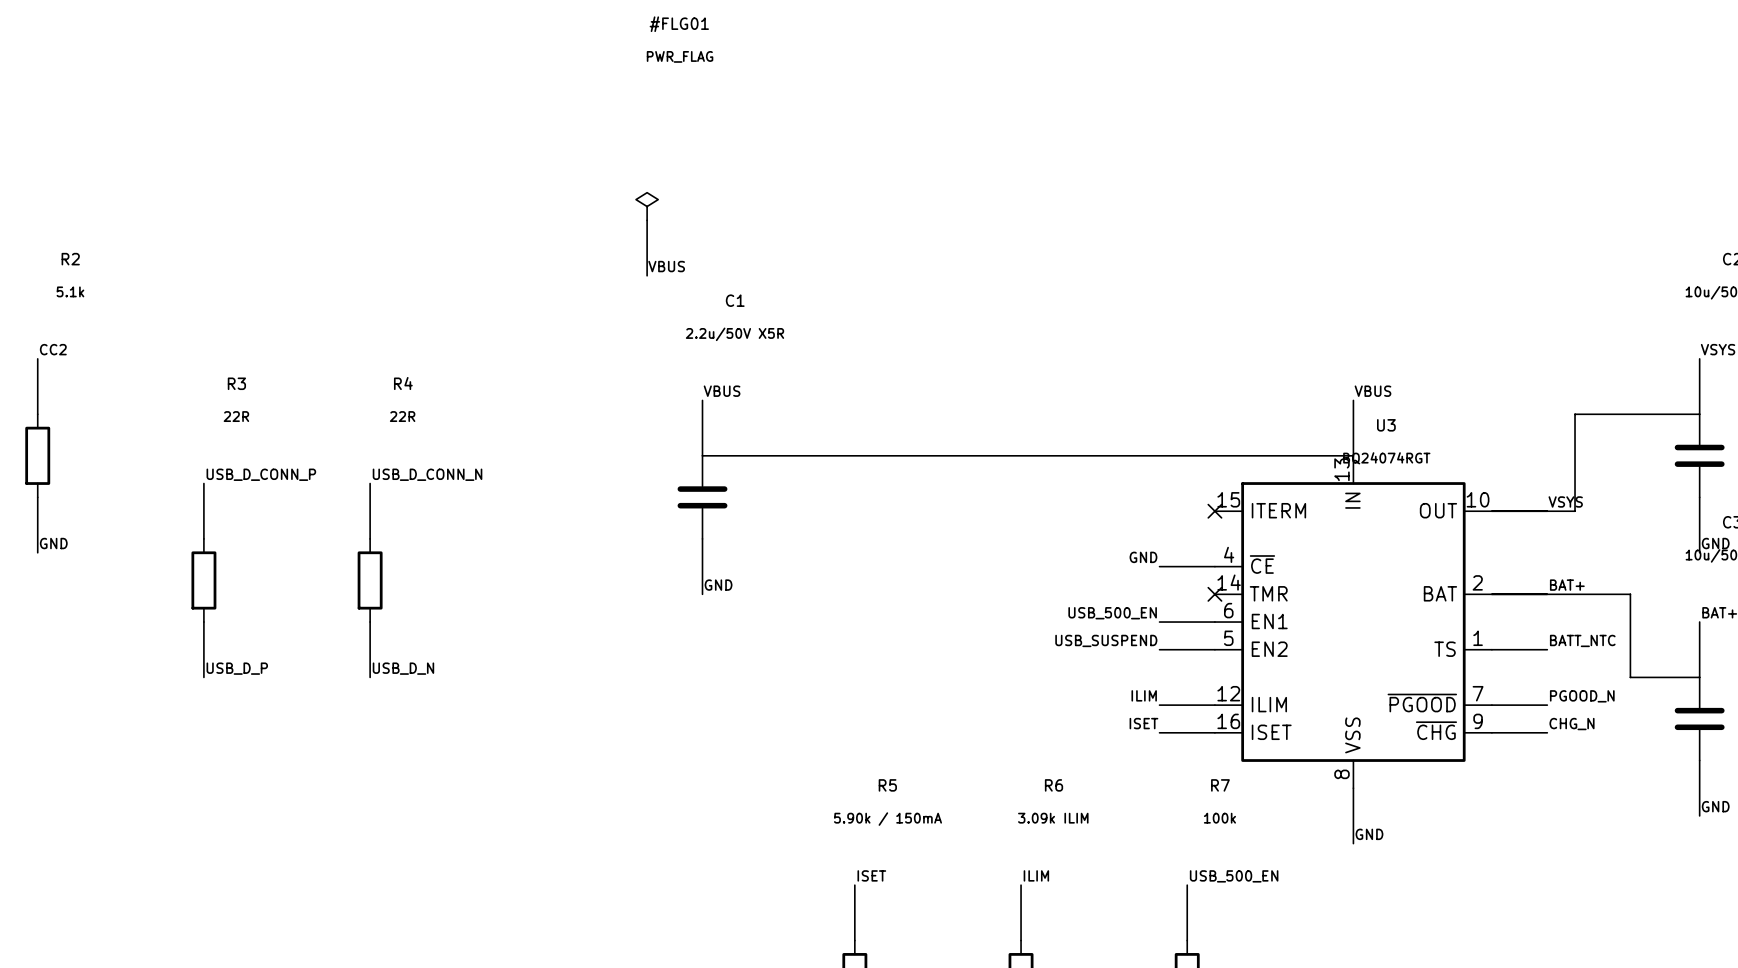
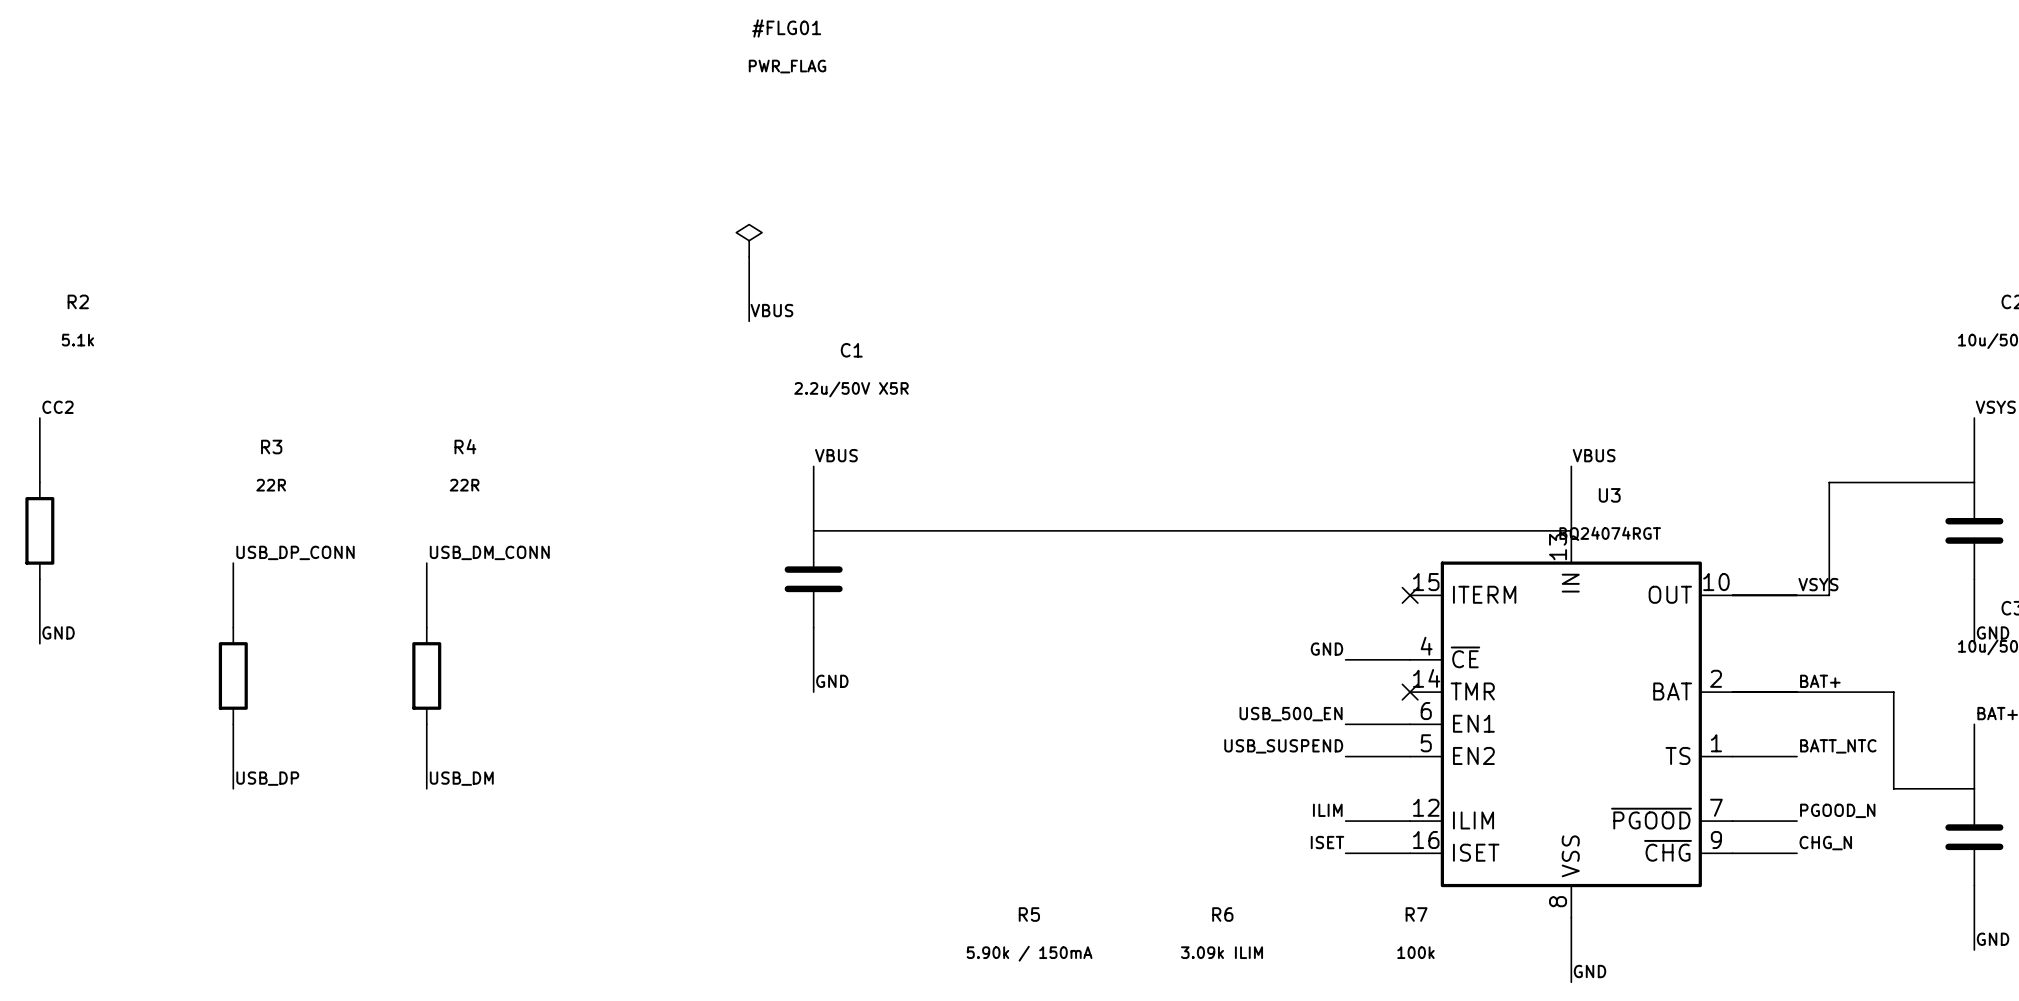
label: USB_D_CONN_P (261, 474) -> USB_DP_CONN (295, 552)
label: USB_D_CONN_N (427, 474) -> USB_DM_CONN (489, 552)
label: USB_D_P (237, 668) -> USB_DP (267, 778)
label: USB_D_N (403, 668) -> USB_DM (461, 778)

